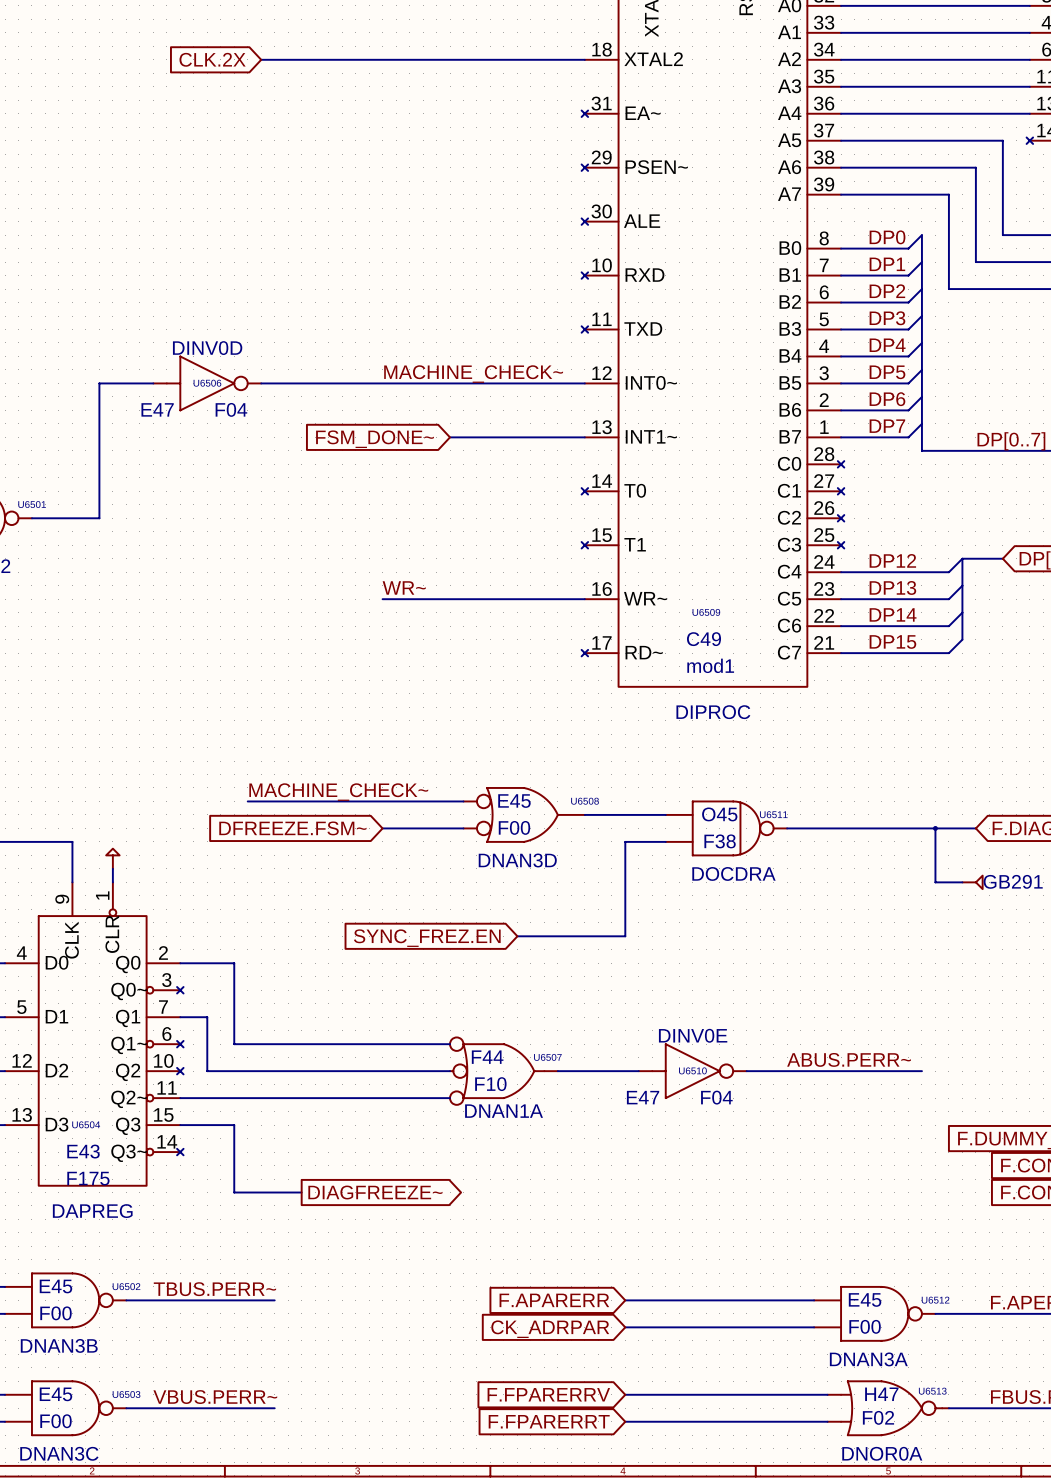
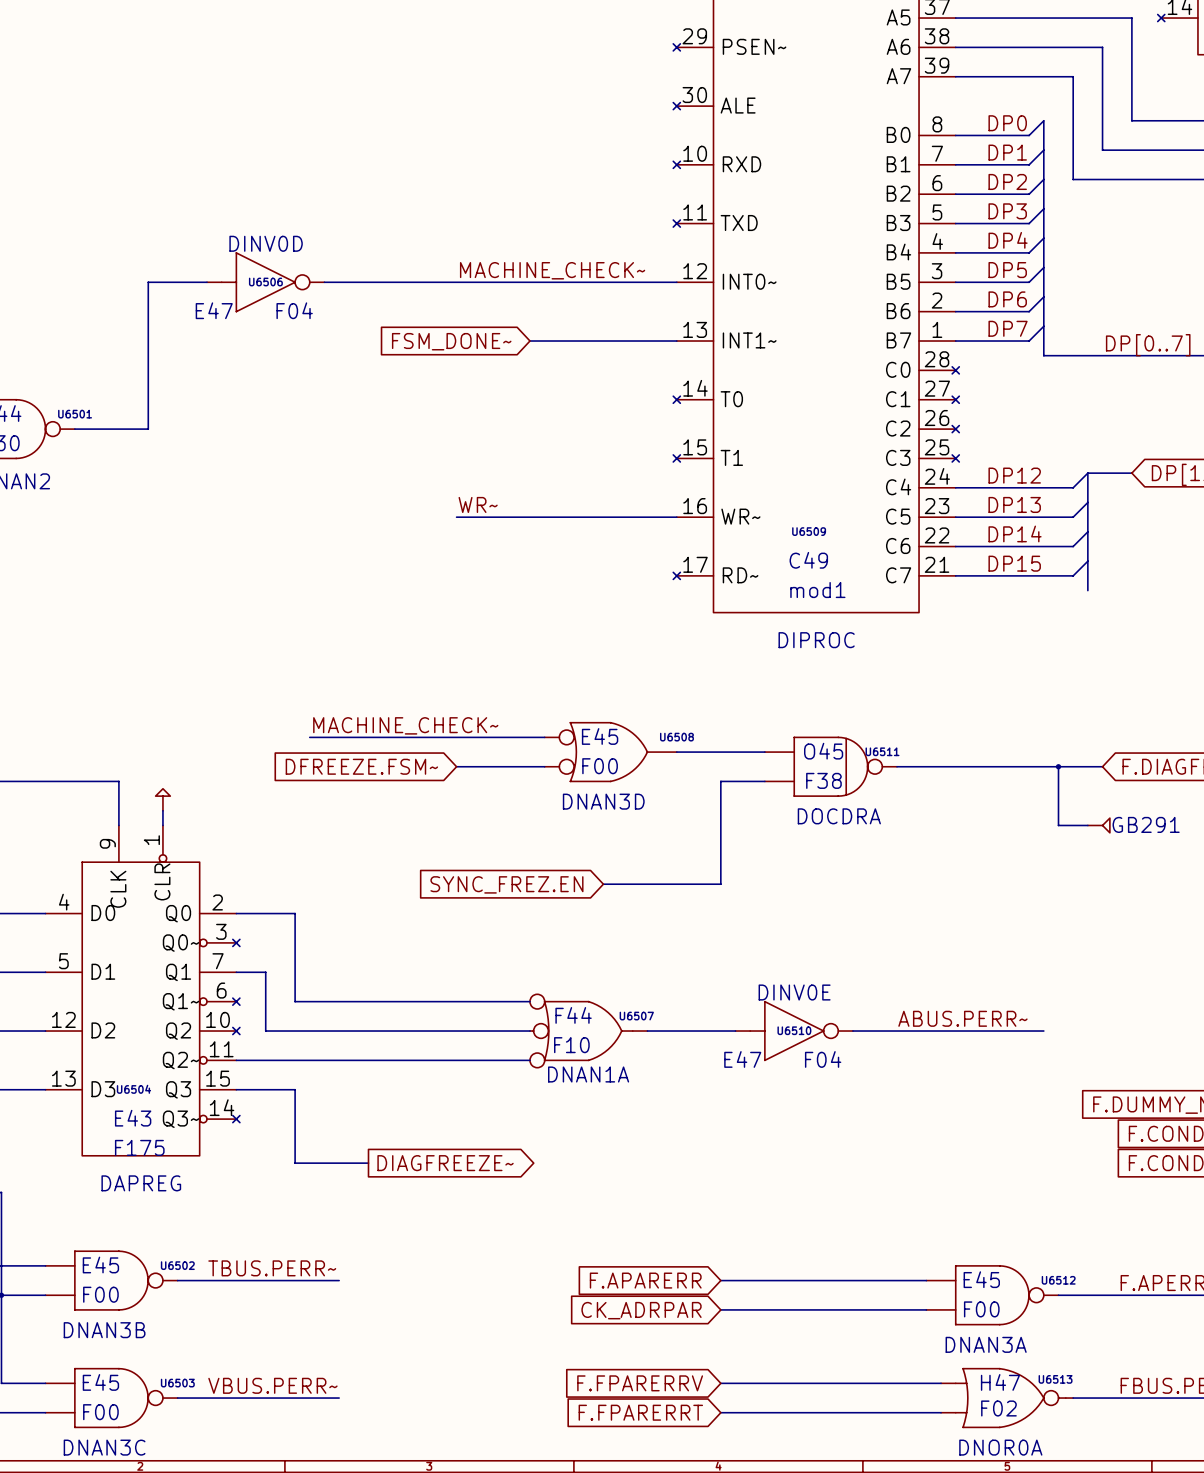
bus: none -> (1087, 561) (1087, 590)

